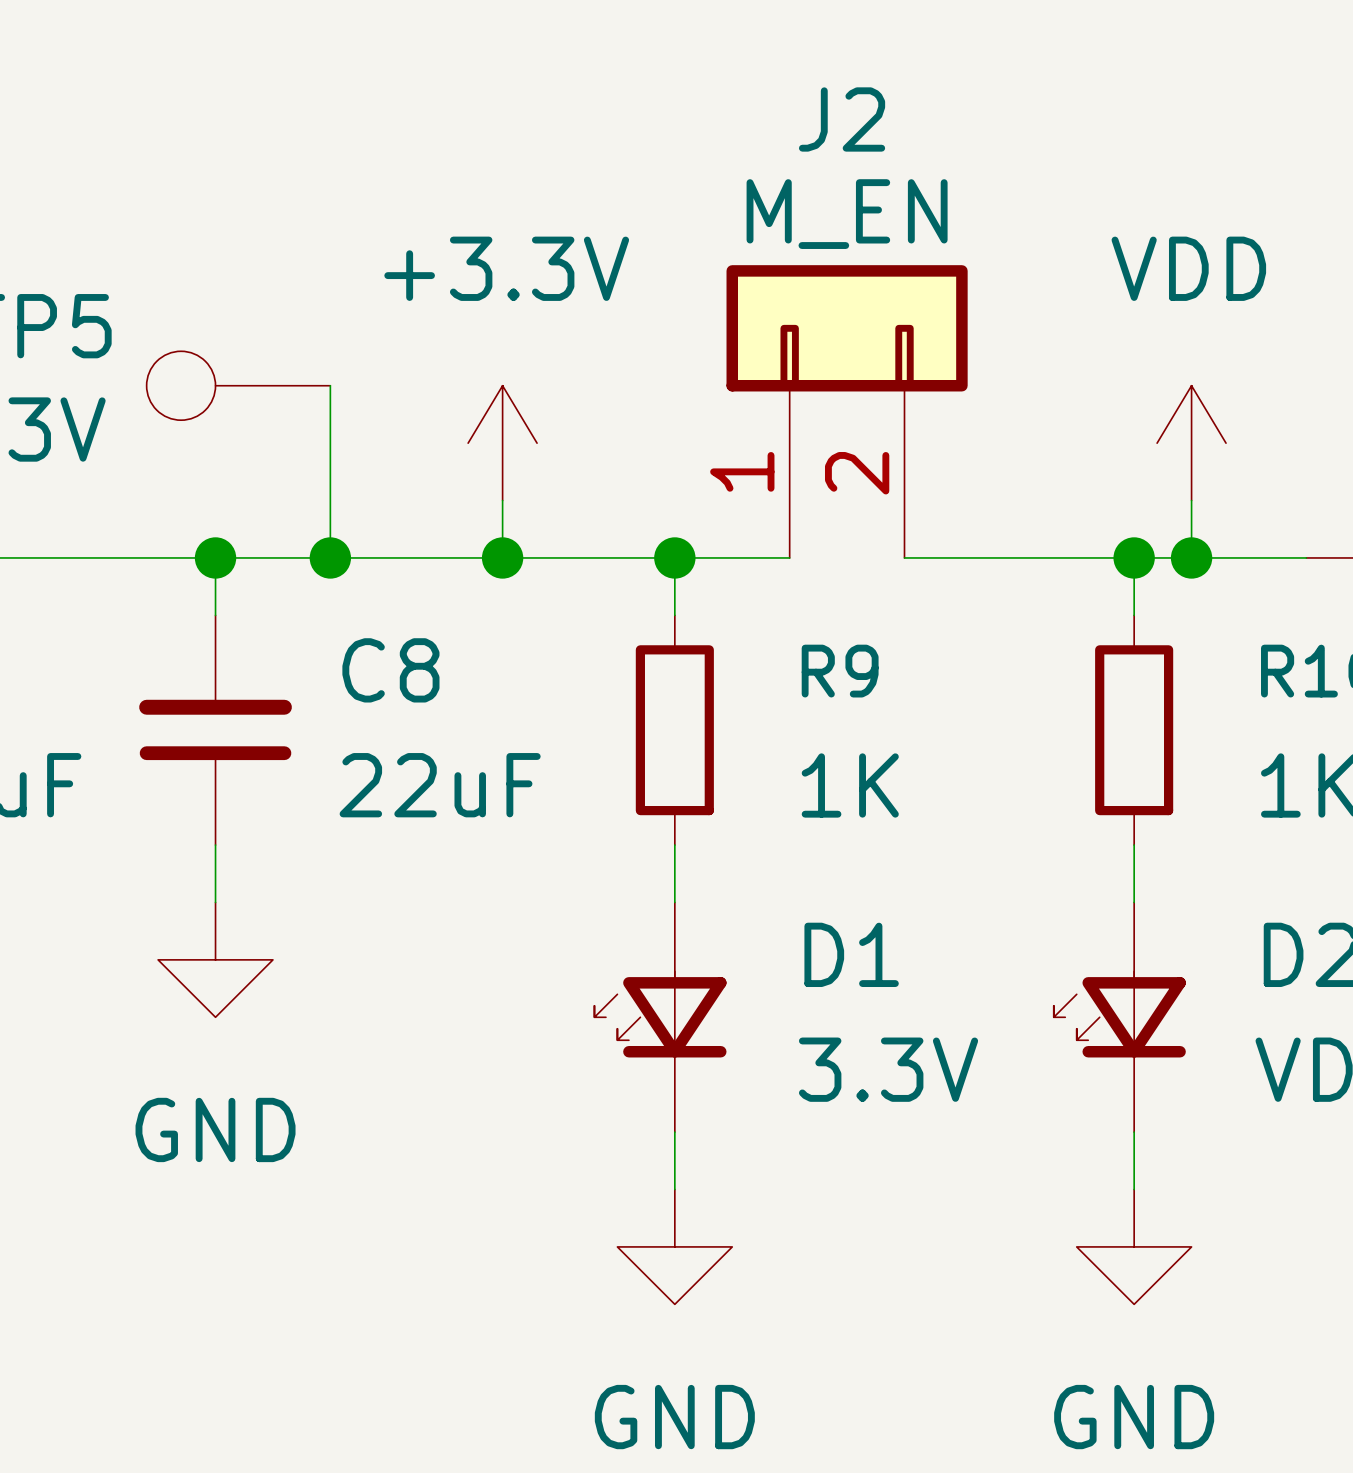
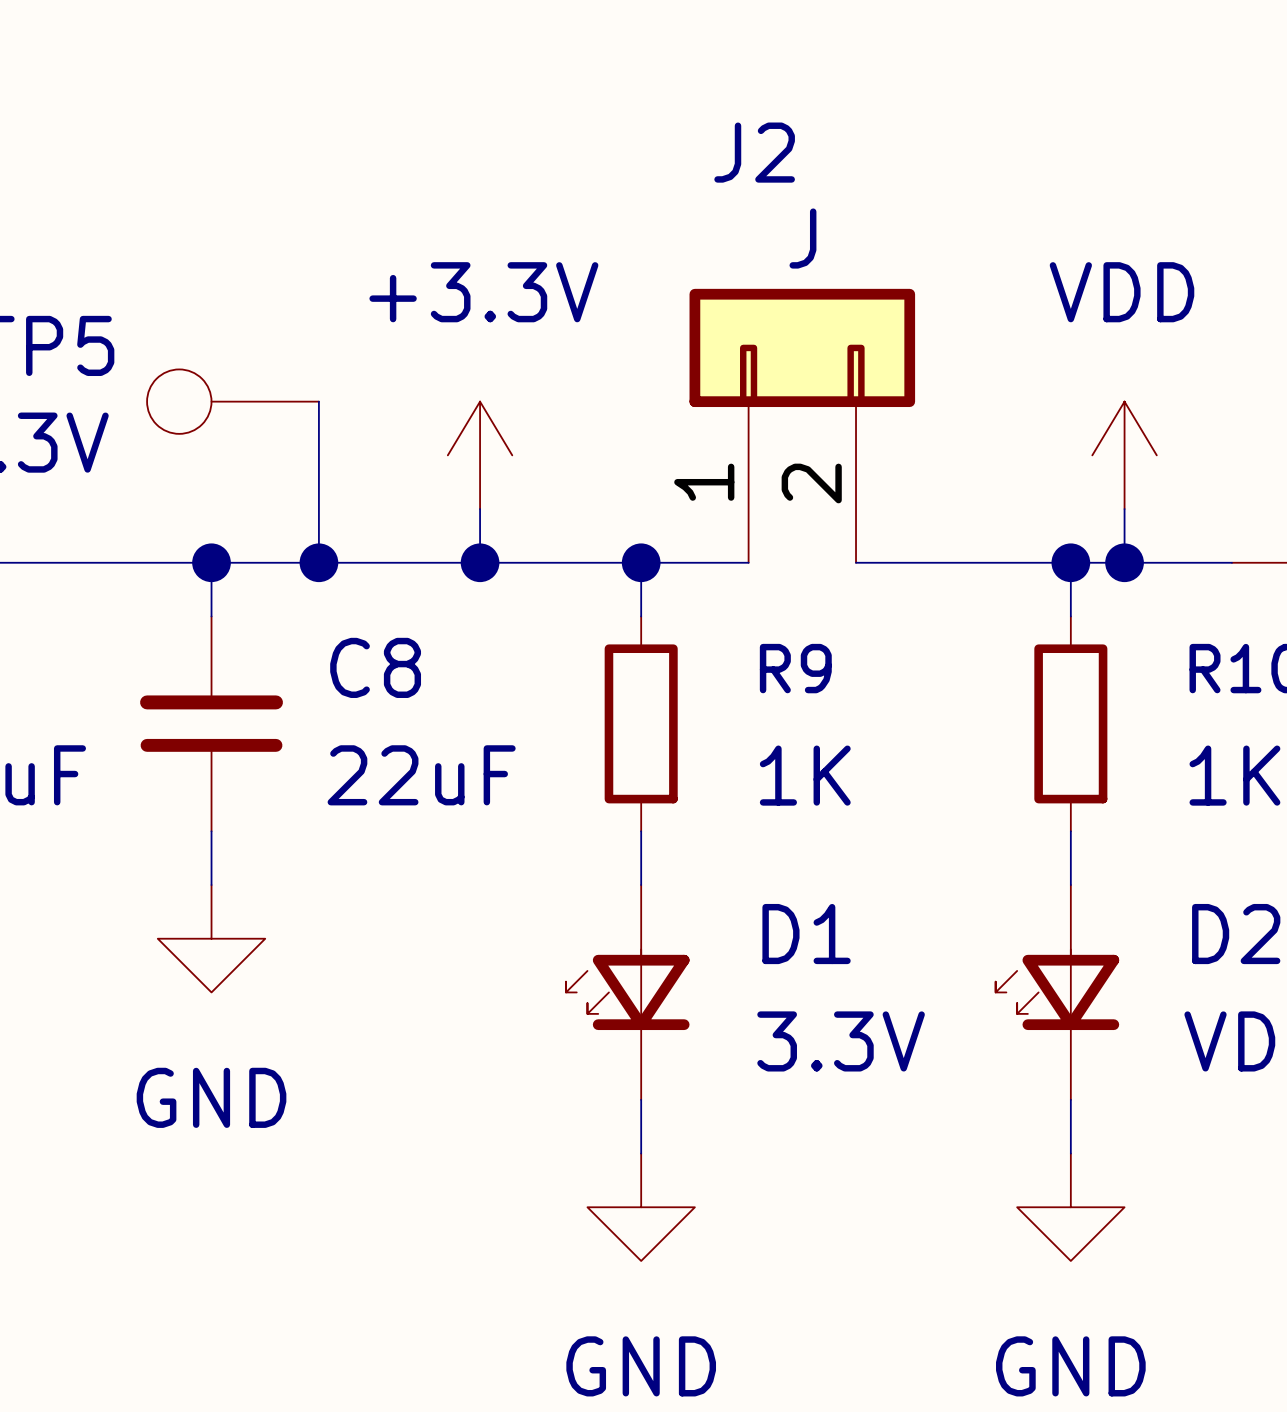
J2 name position: J2 (842, 119) -> J2 (754, 152)
J2 value: M_EN (847, 214) -> J (802, 238)

